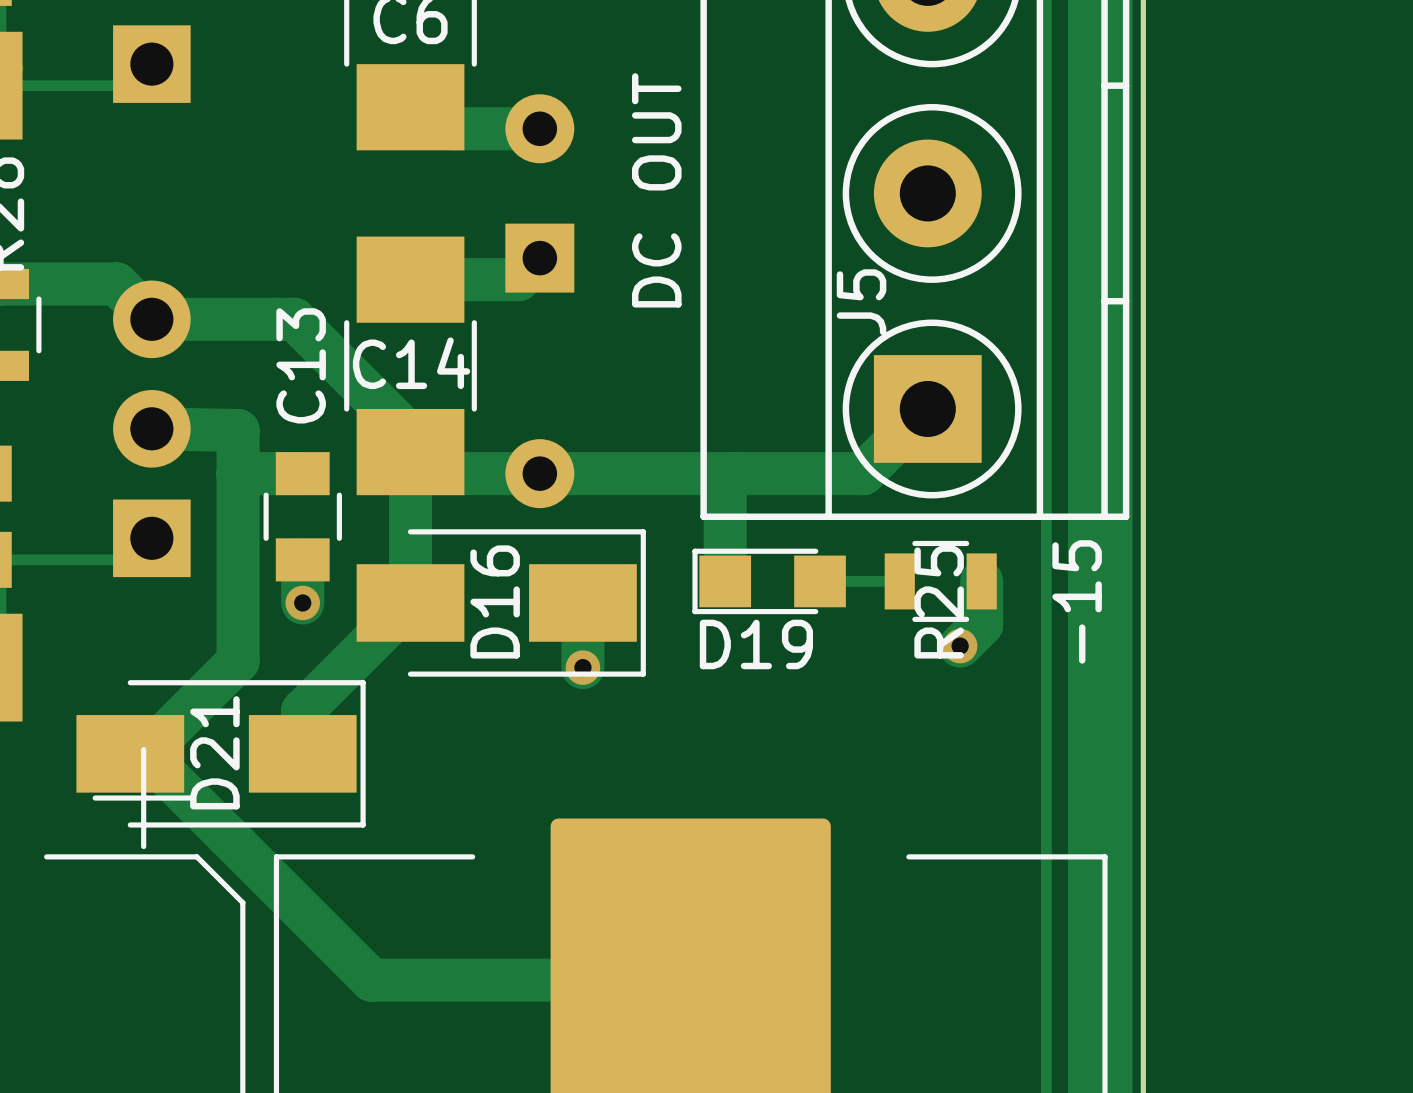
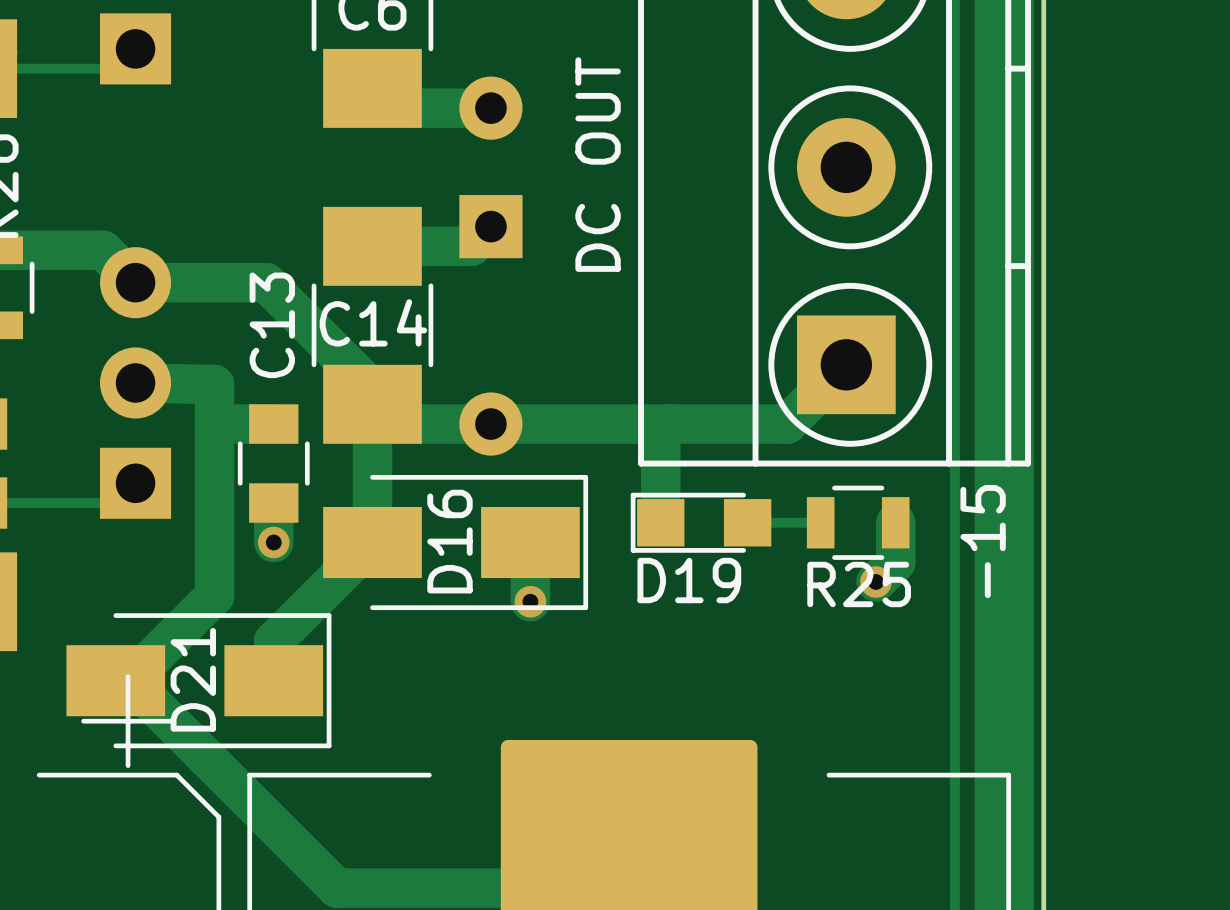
J5 name: J5 (861, 302) -> none
R25 name rotation: 0° (939, 601) -> 90° clockwise (859, 584)

